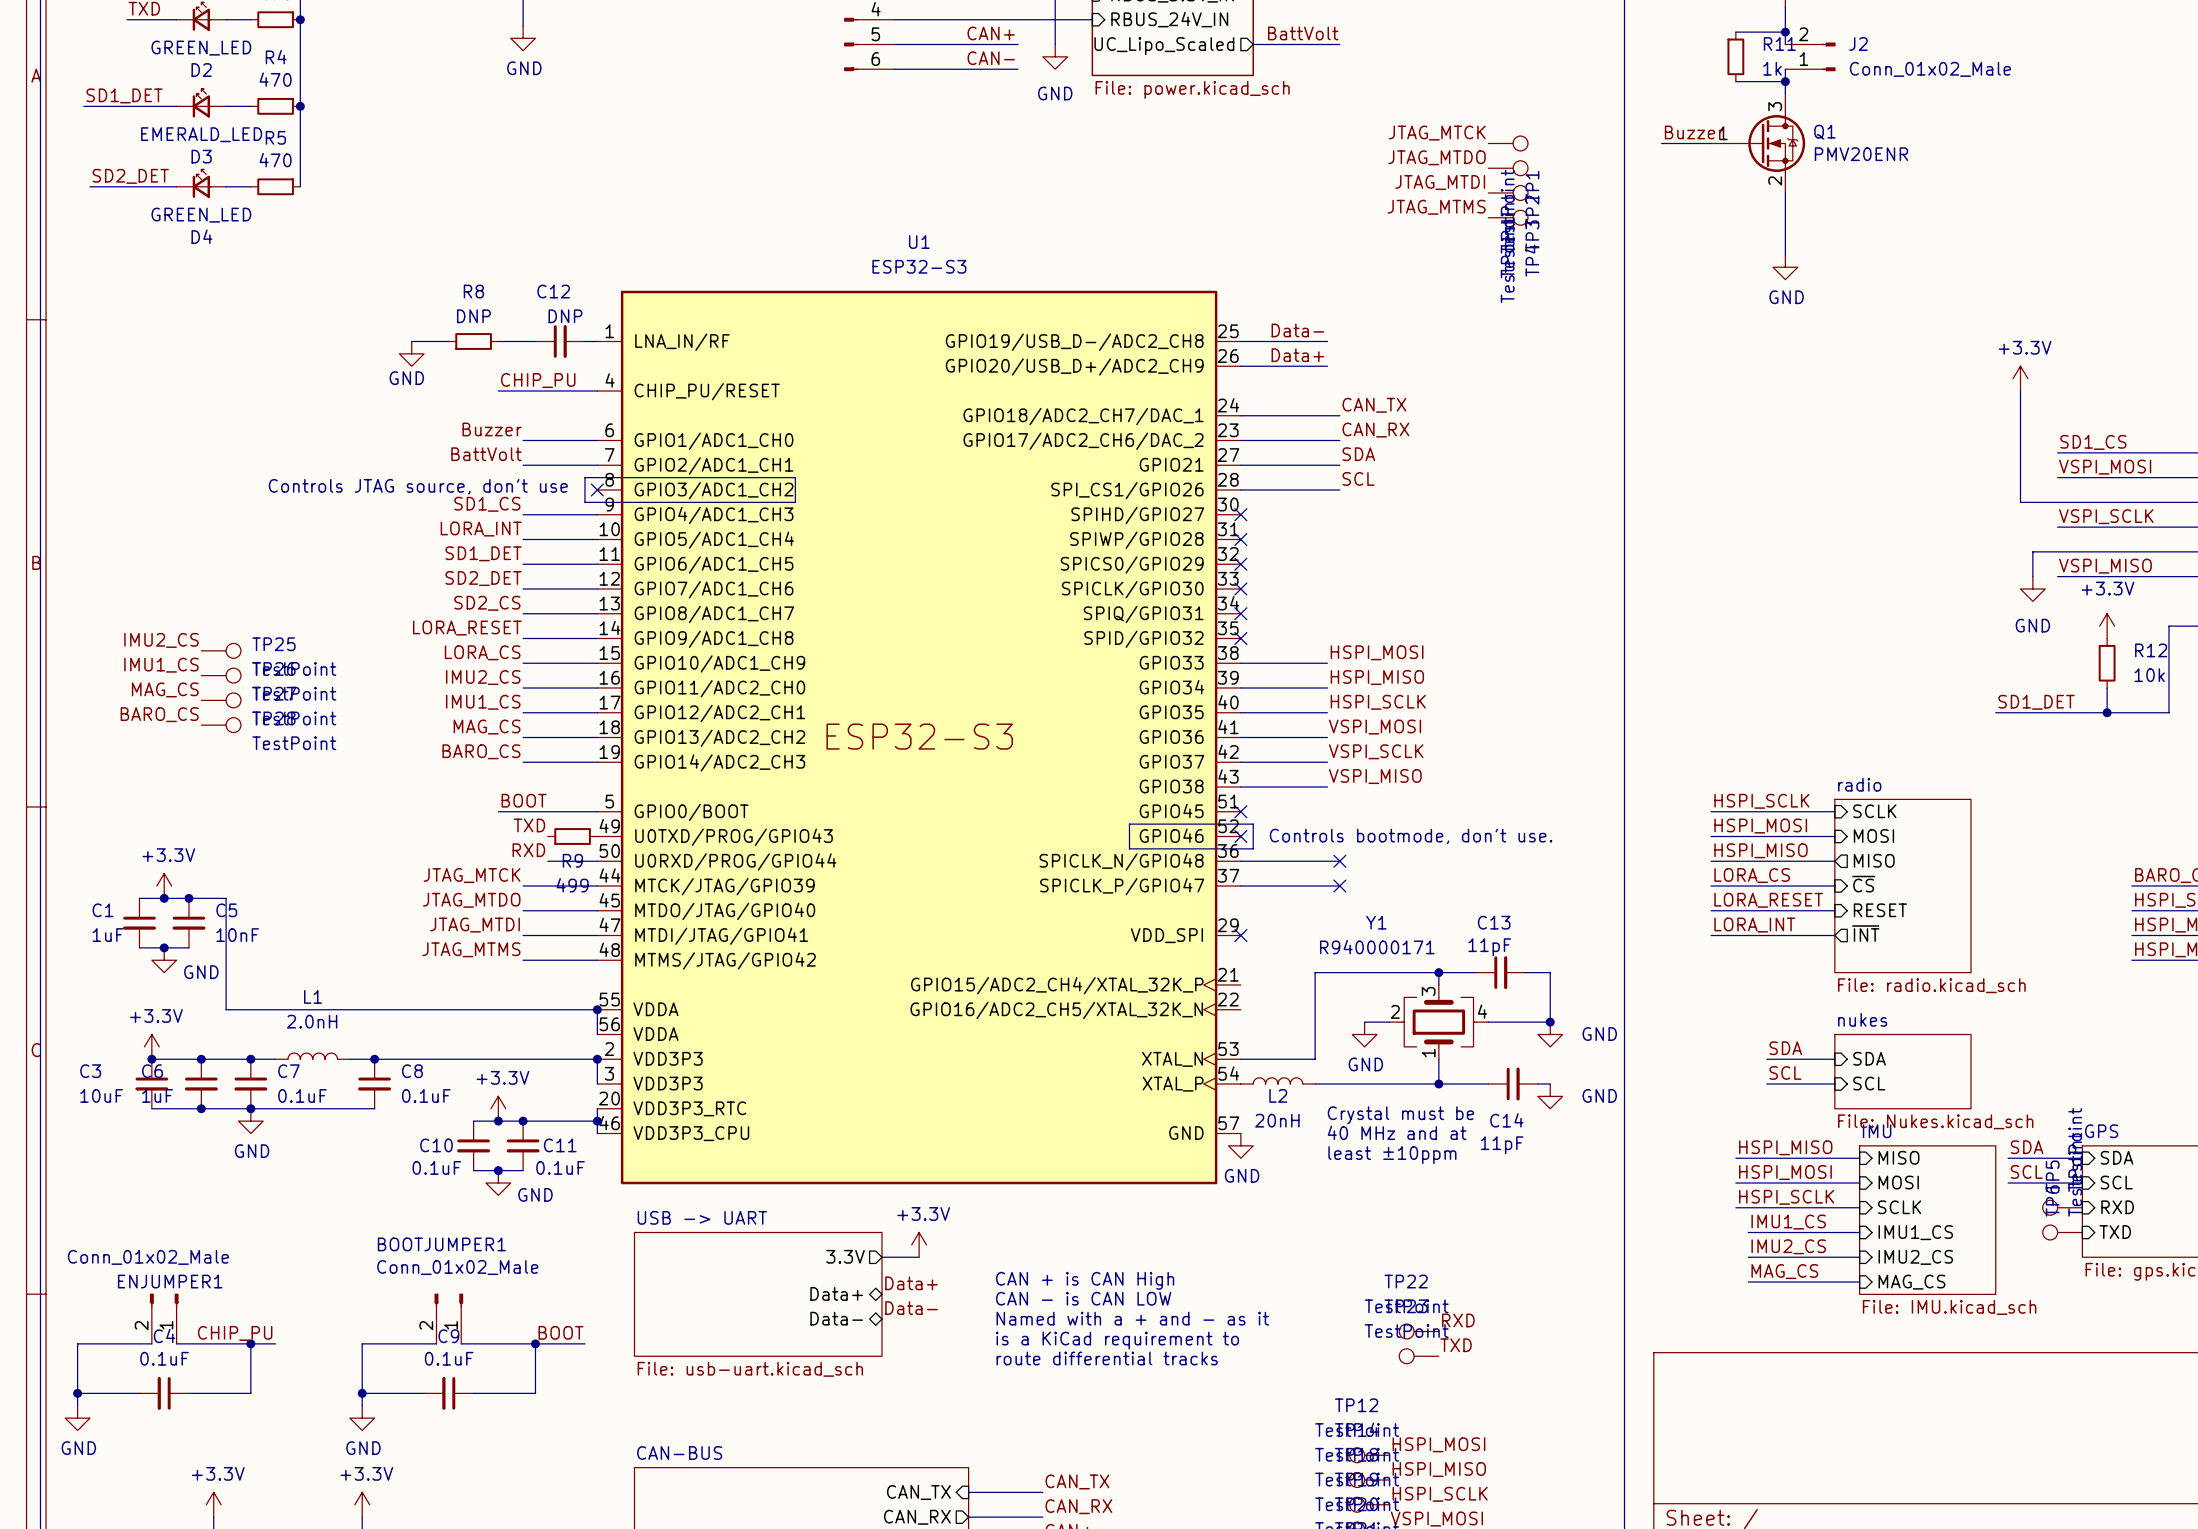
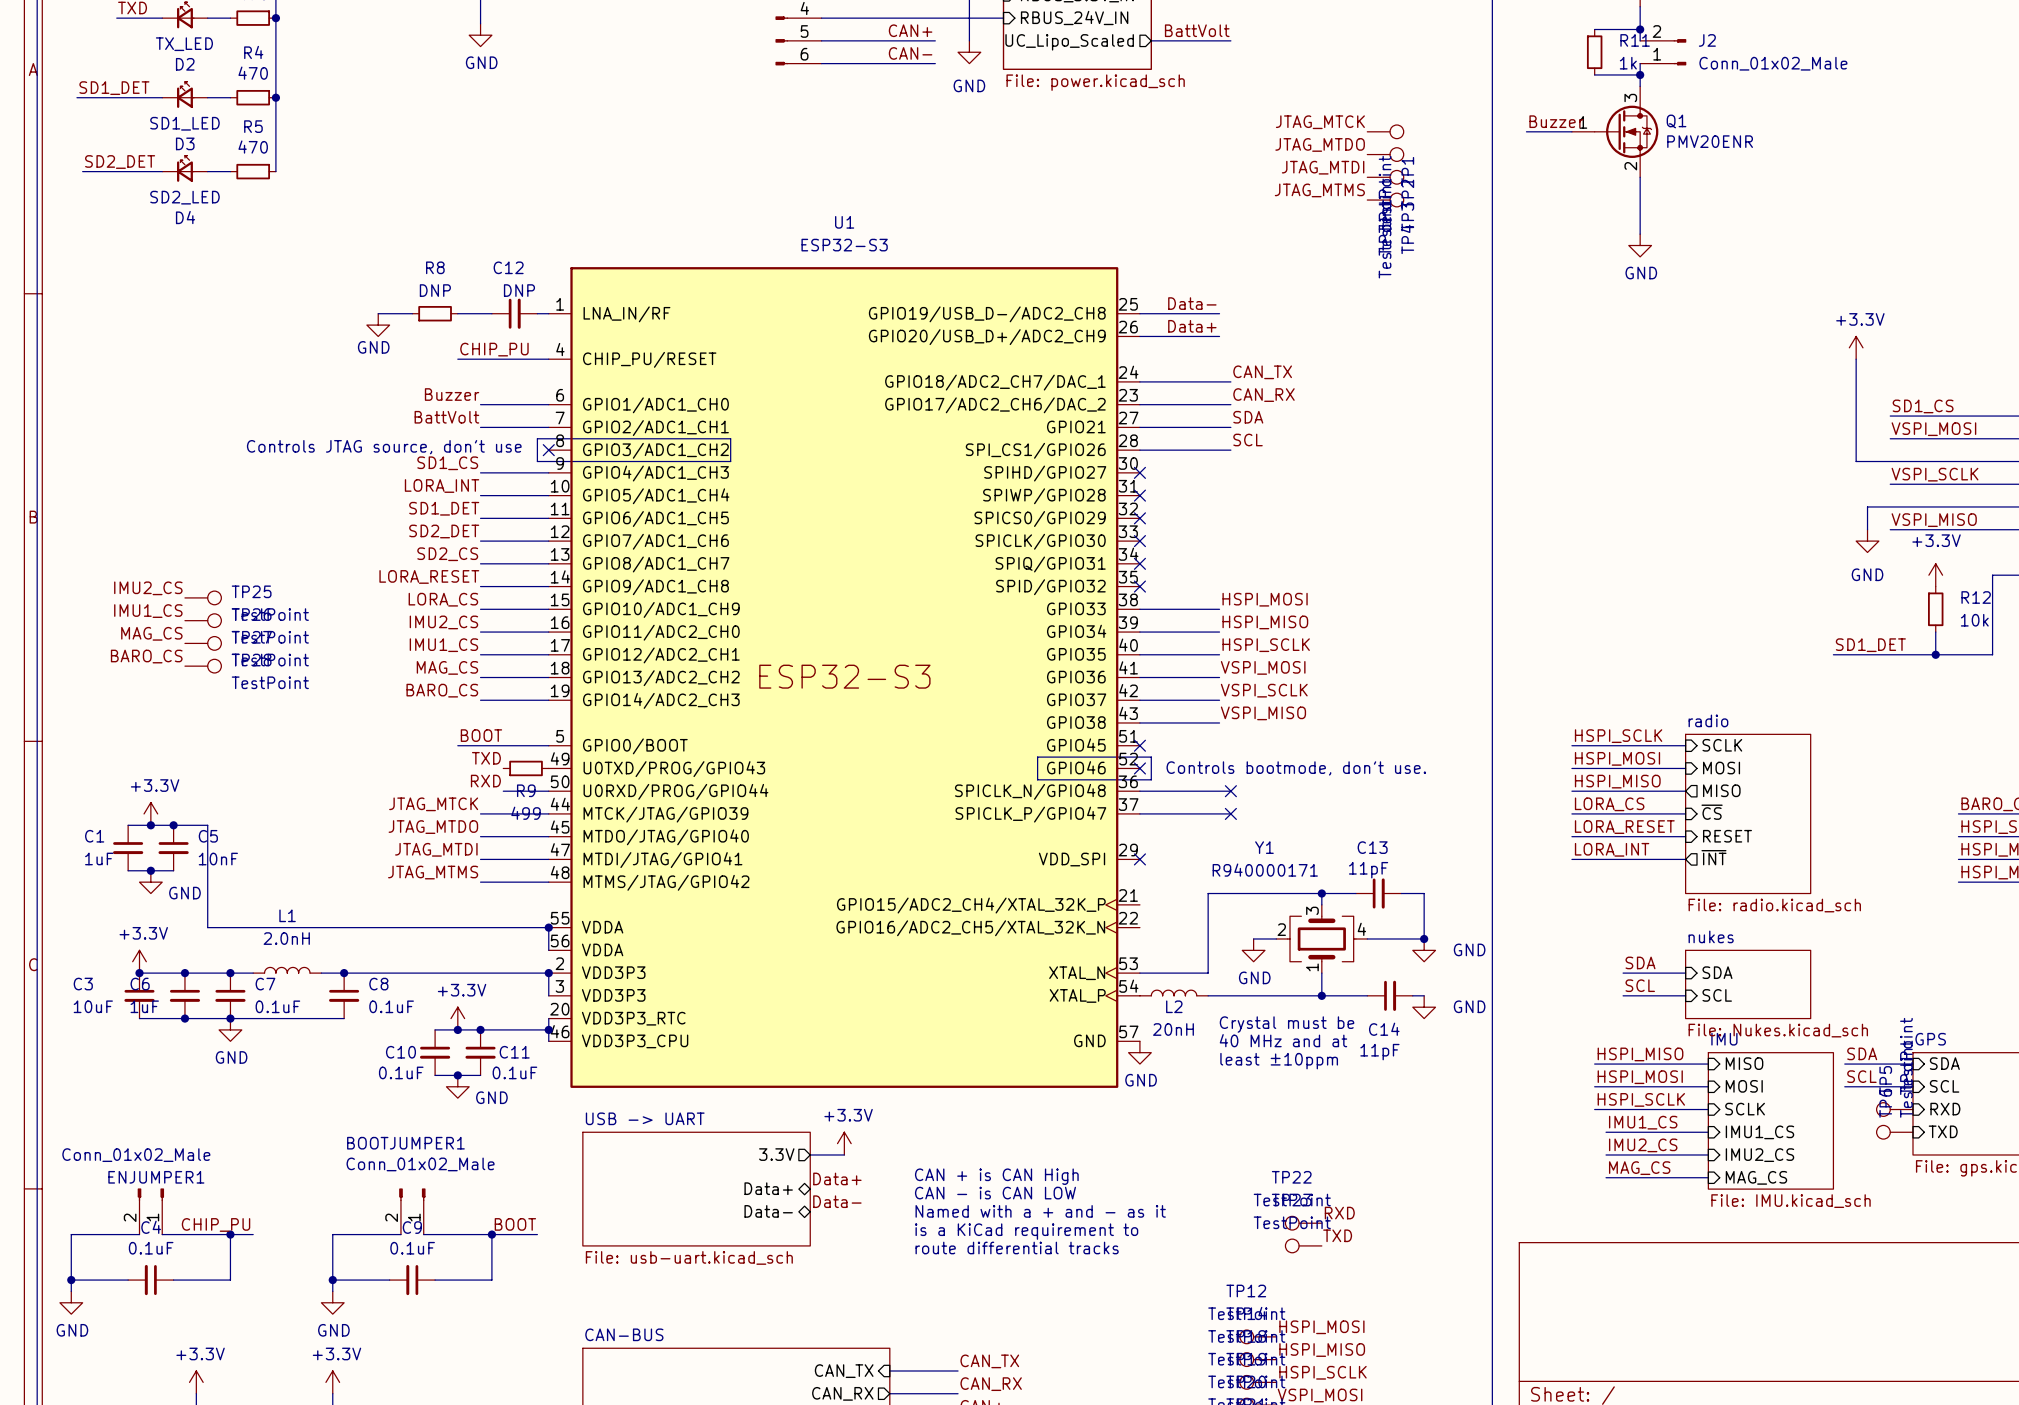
D2 value: GREEN_LED (201, 48) -> TX_LED (184, 44)
D3 value: EMERALD_LED (201, 134) -> SD1_LED (184, 123)
D4 value: GREEN_LED (201, 215) -> SD2_LED (184, 197)

